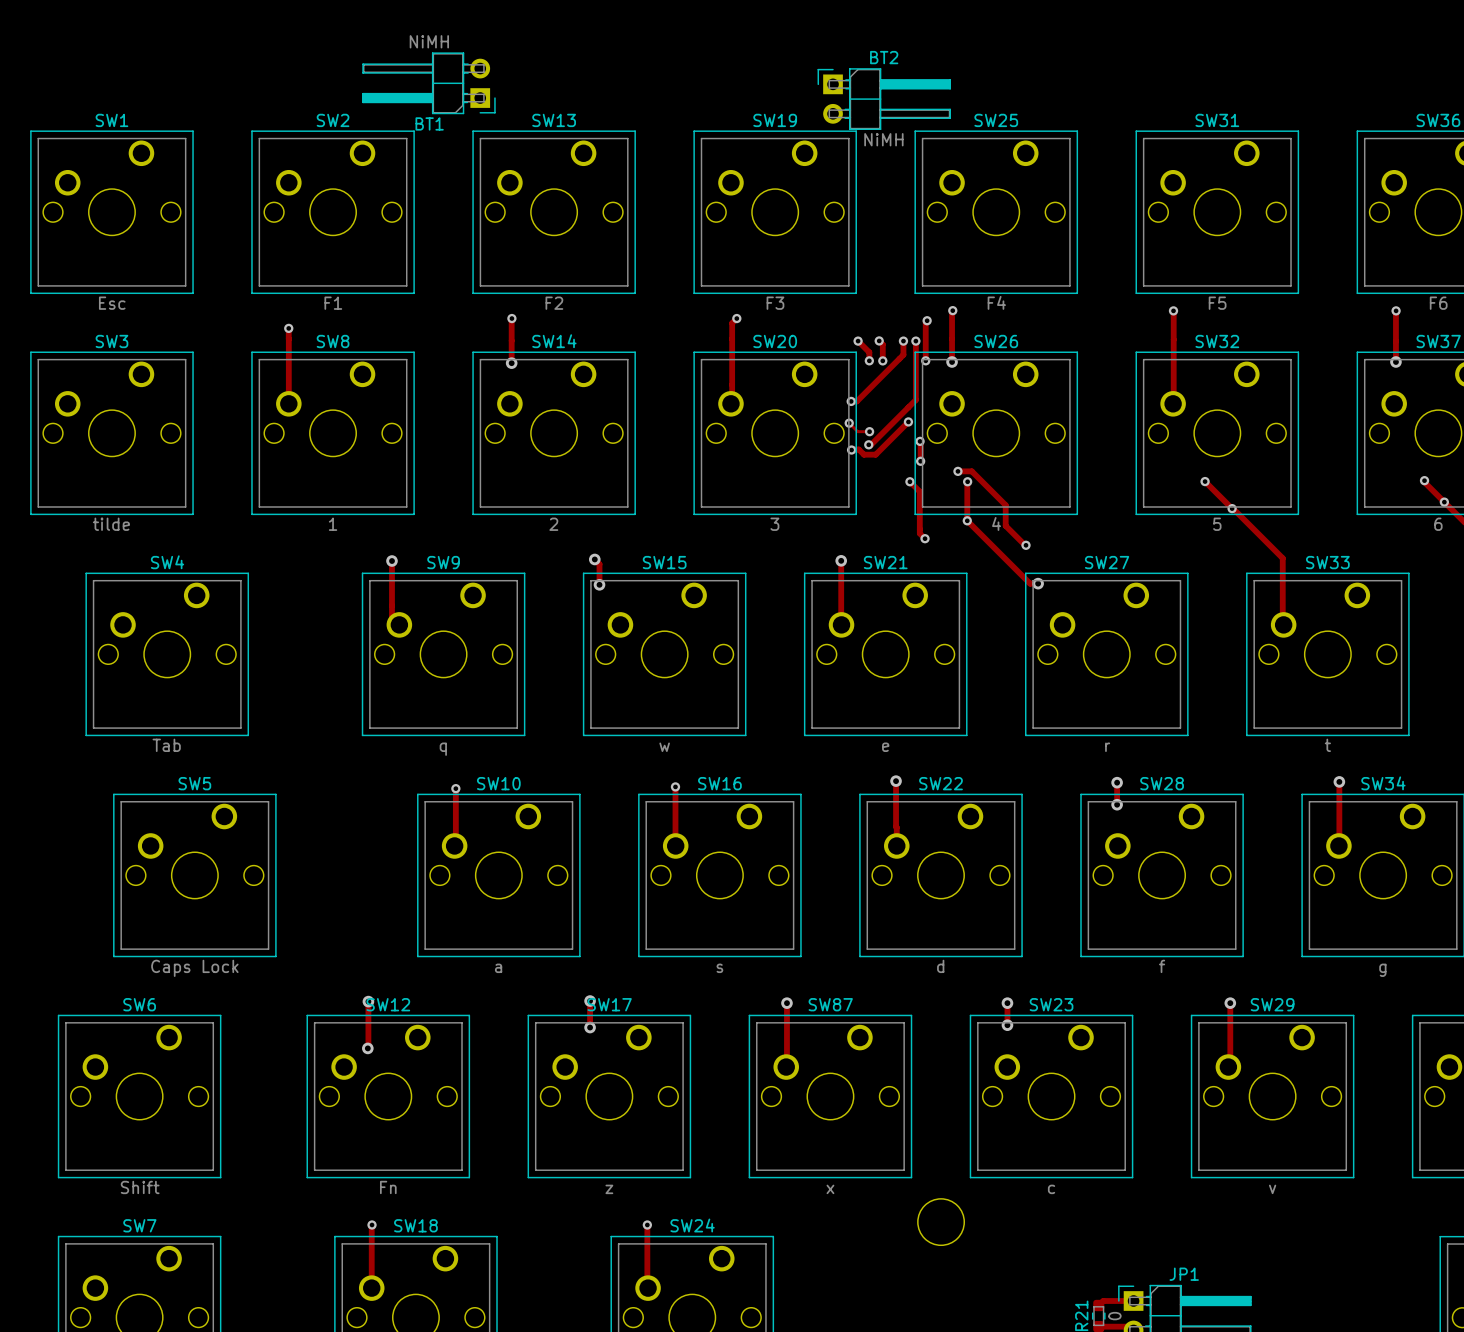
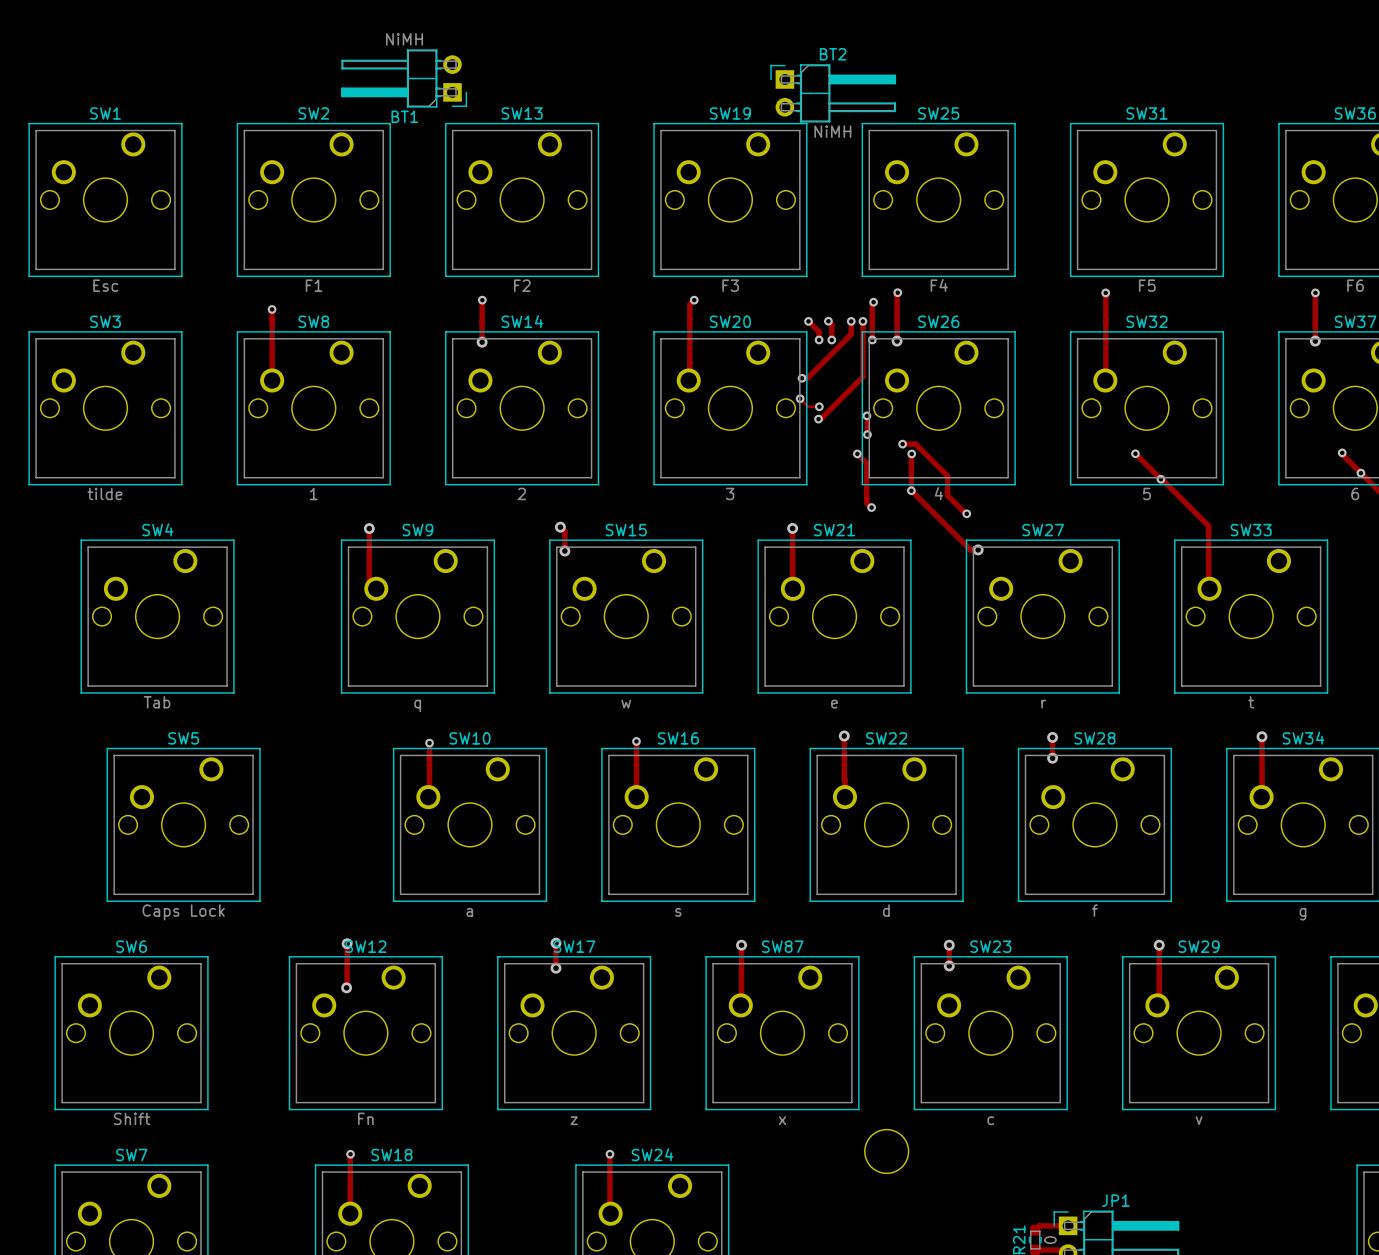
track: (908, 421) (875, 454) (864, 454) (858, 449) (851, 450) -> none
via: (908, 421) -> none
via: (851, 450) -> none

